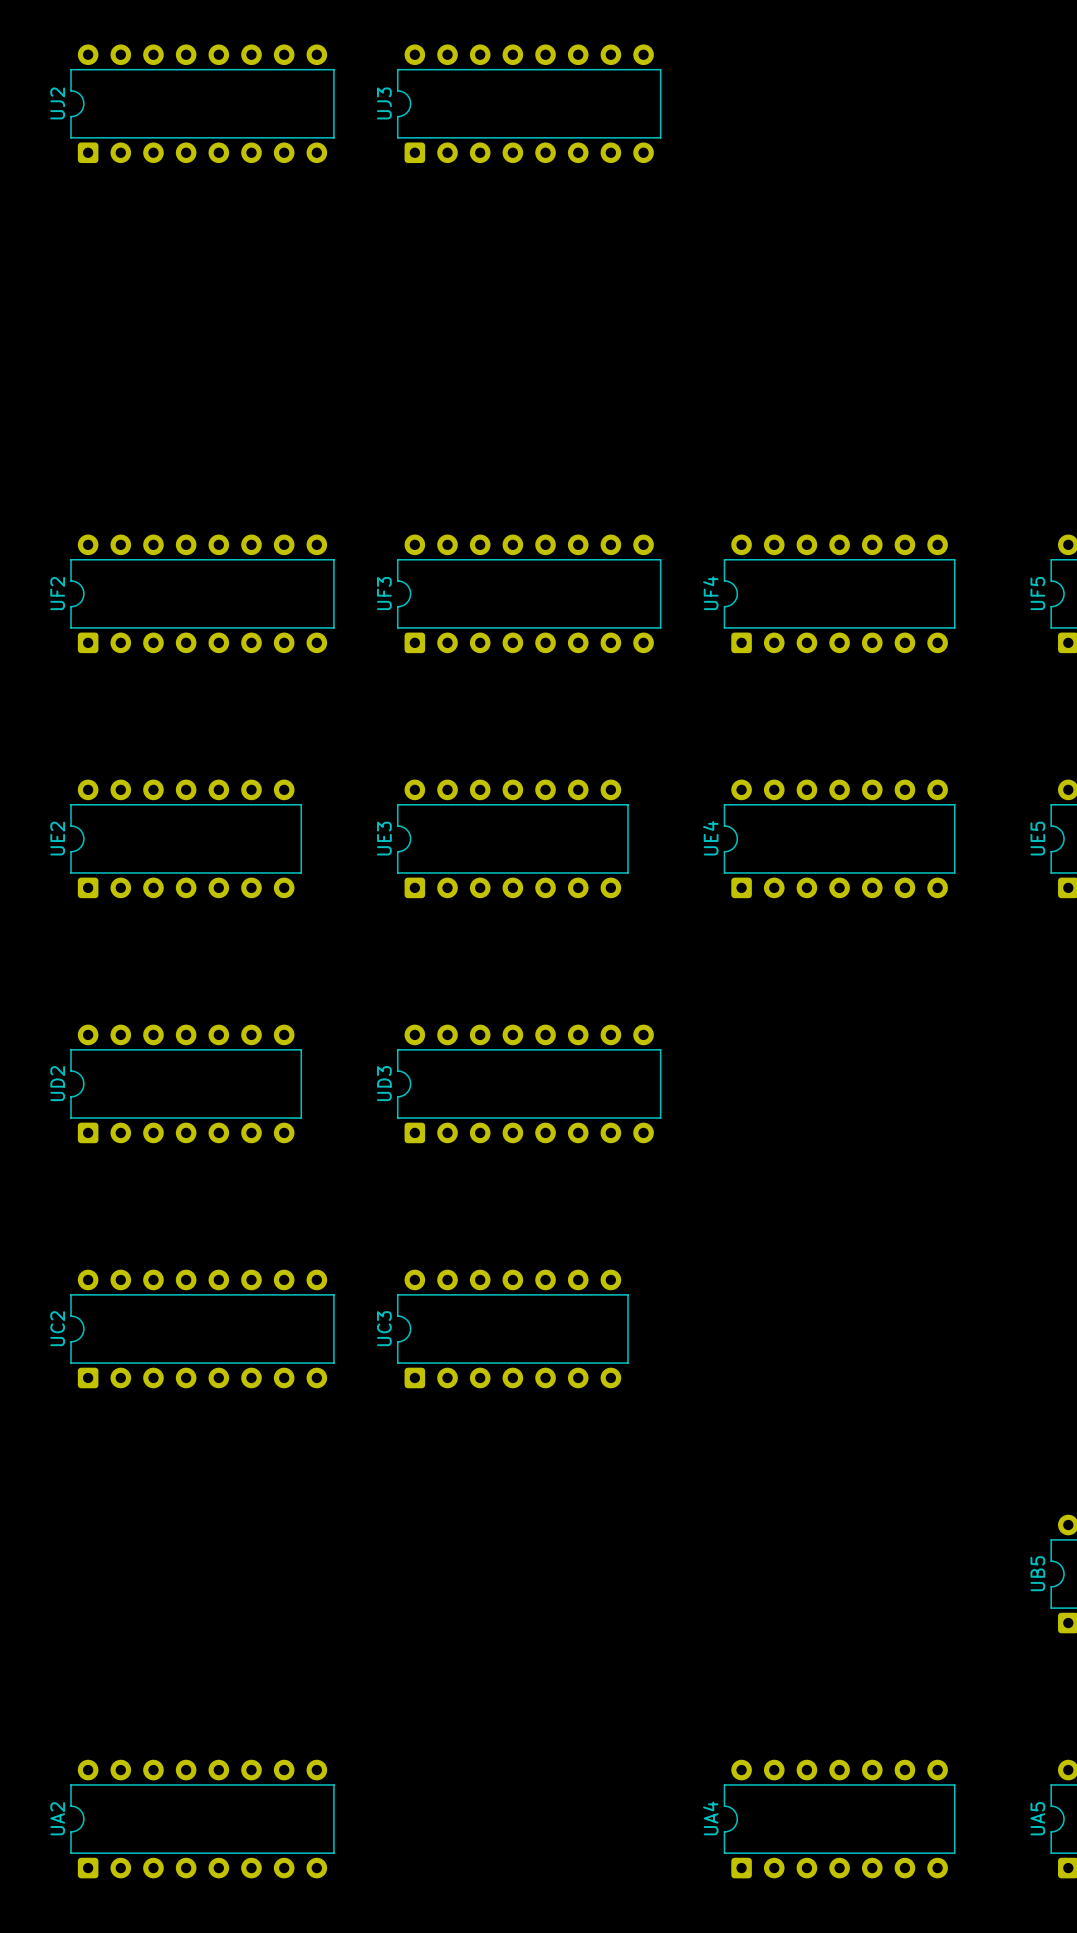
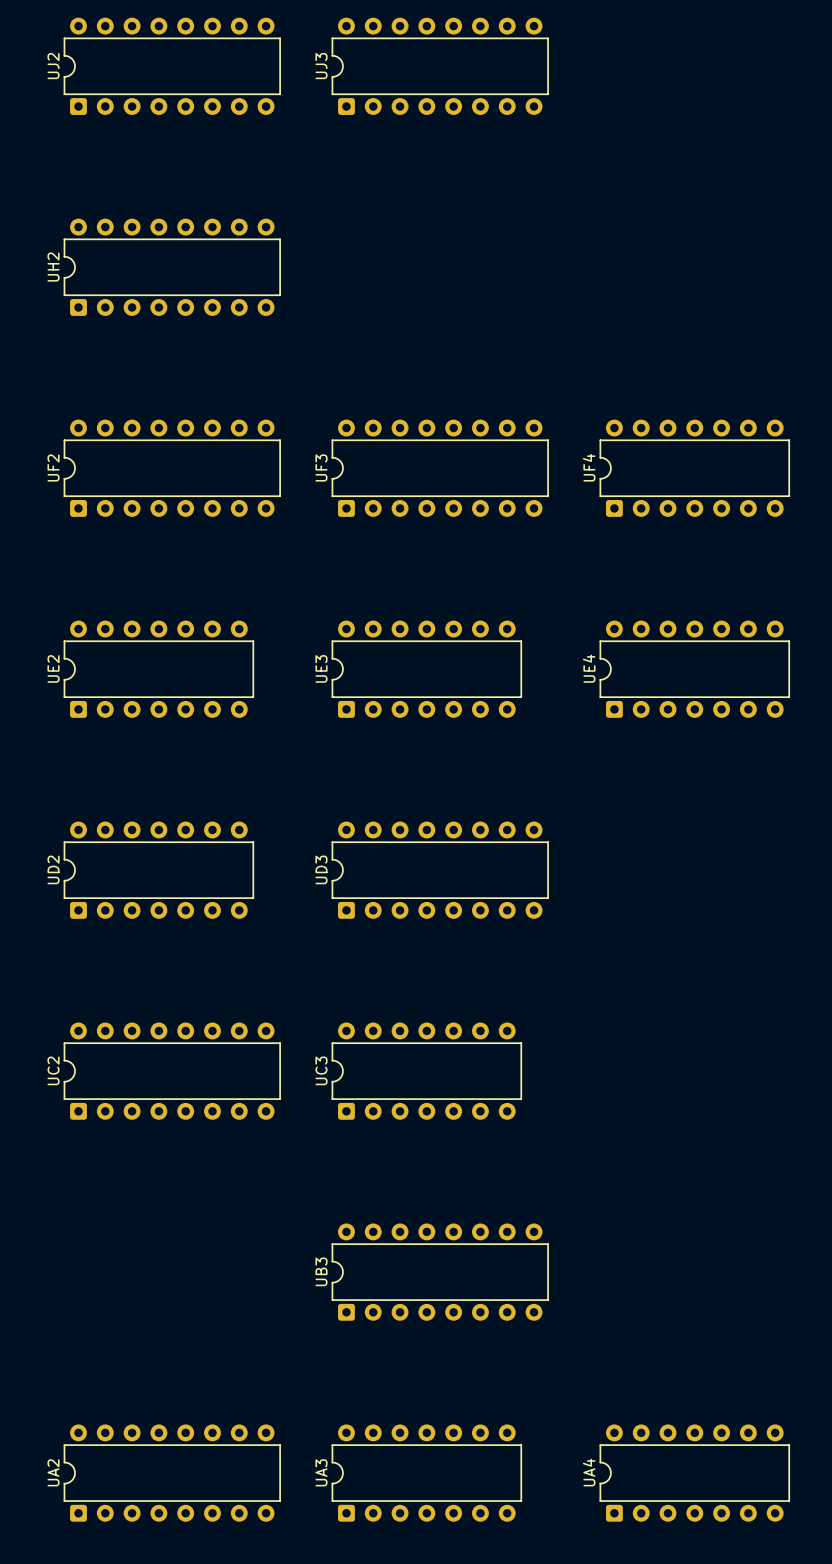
UH2: none -> (172, 267)
UB3: none -> (440, 1272)
UA3: none -> (426, 1473)

